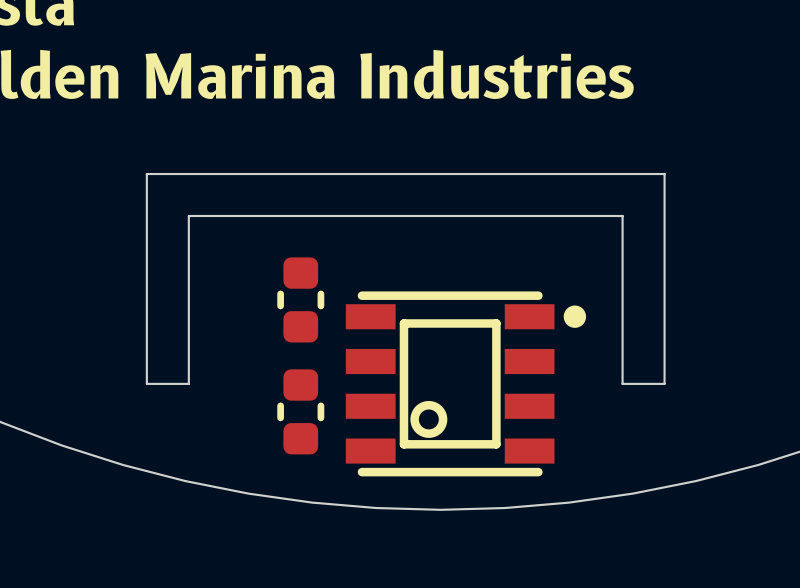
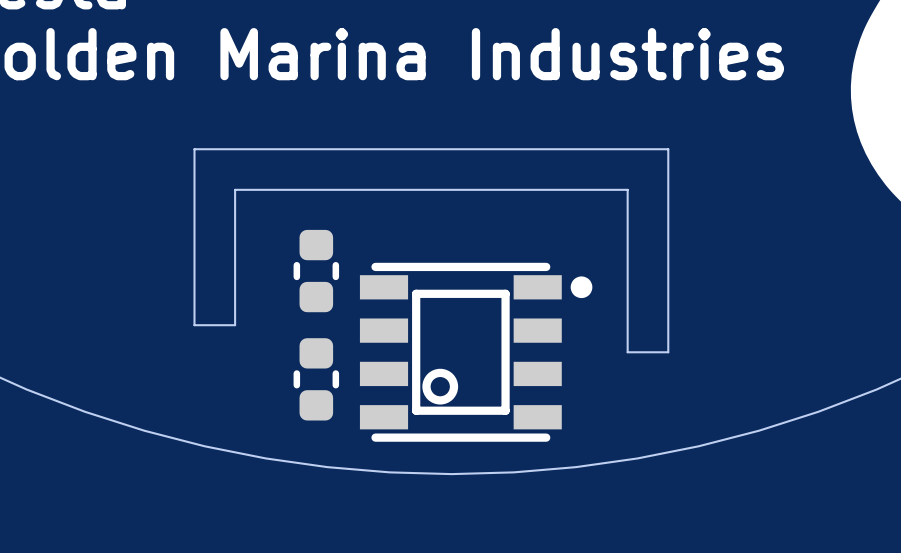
board edge: (174, 174) (146, 174) (146, 383) (188, 383) (188, 215) (216, 215) -> (194, 149) (194, 325) (235, 325) (235, 189)

